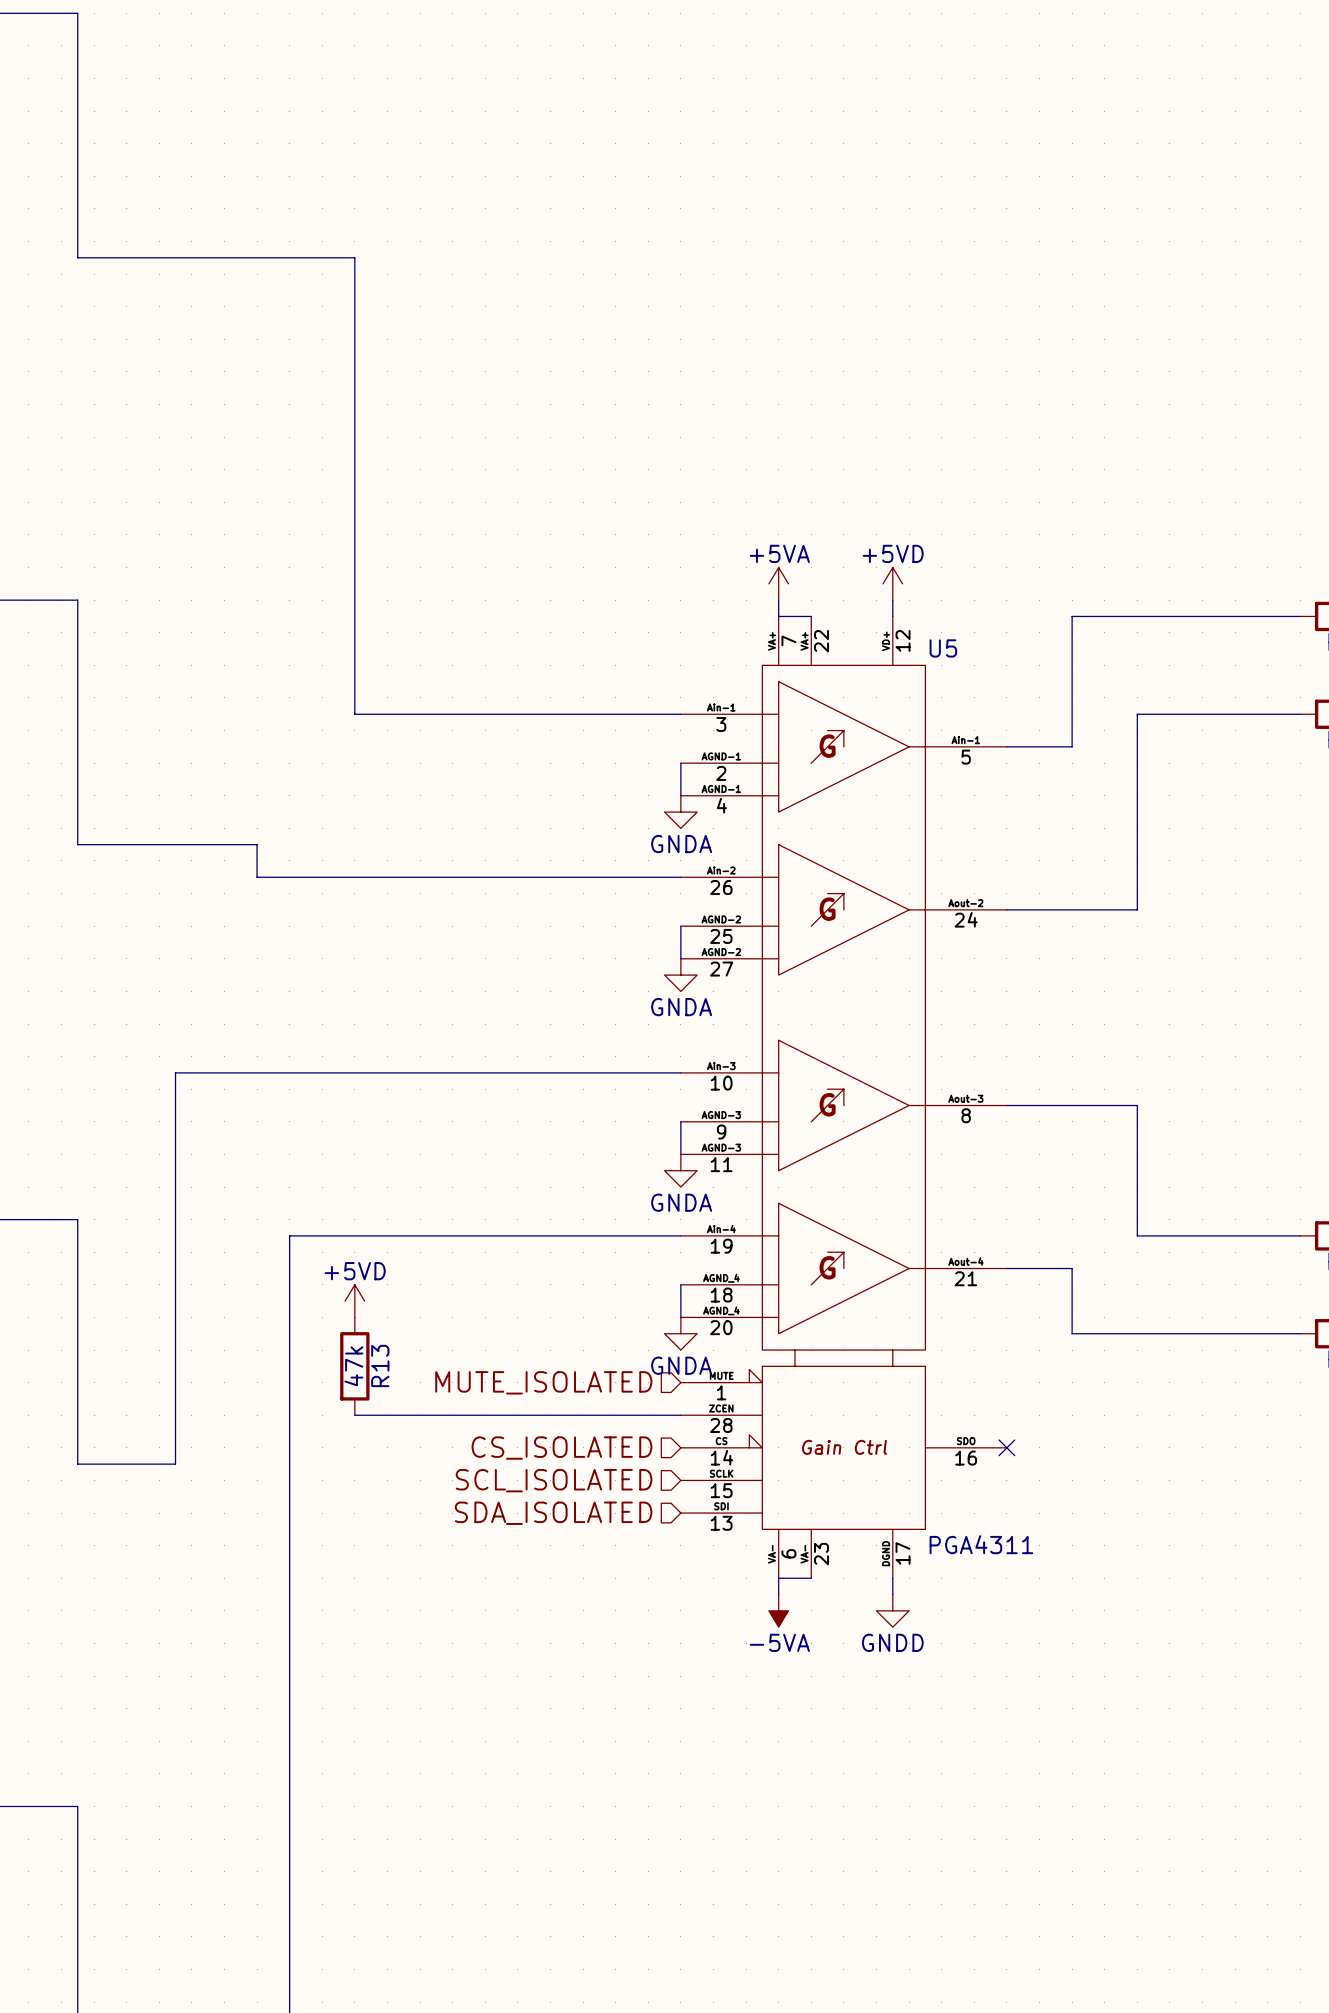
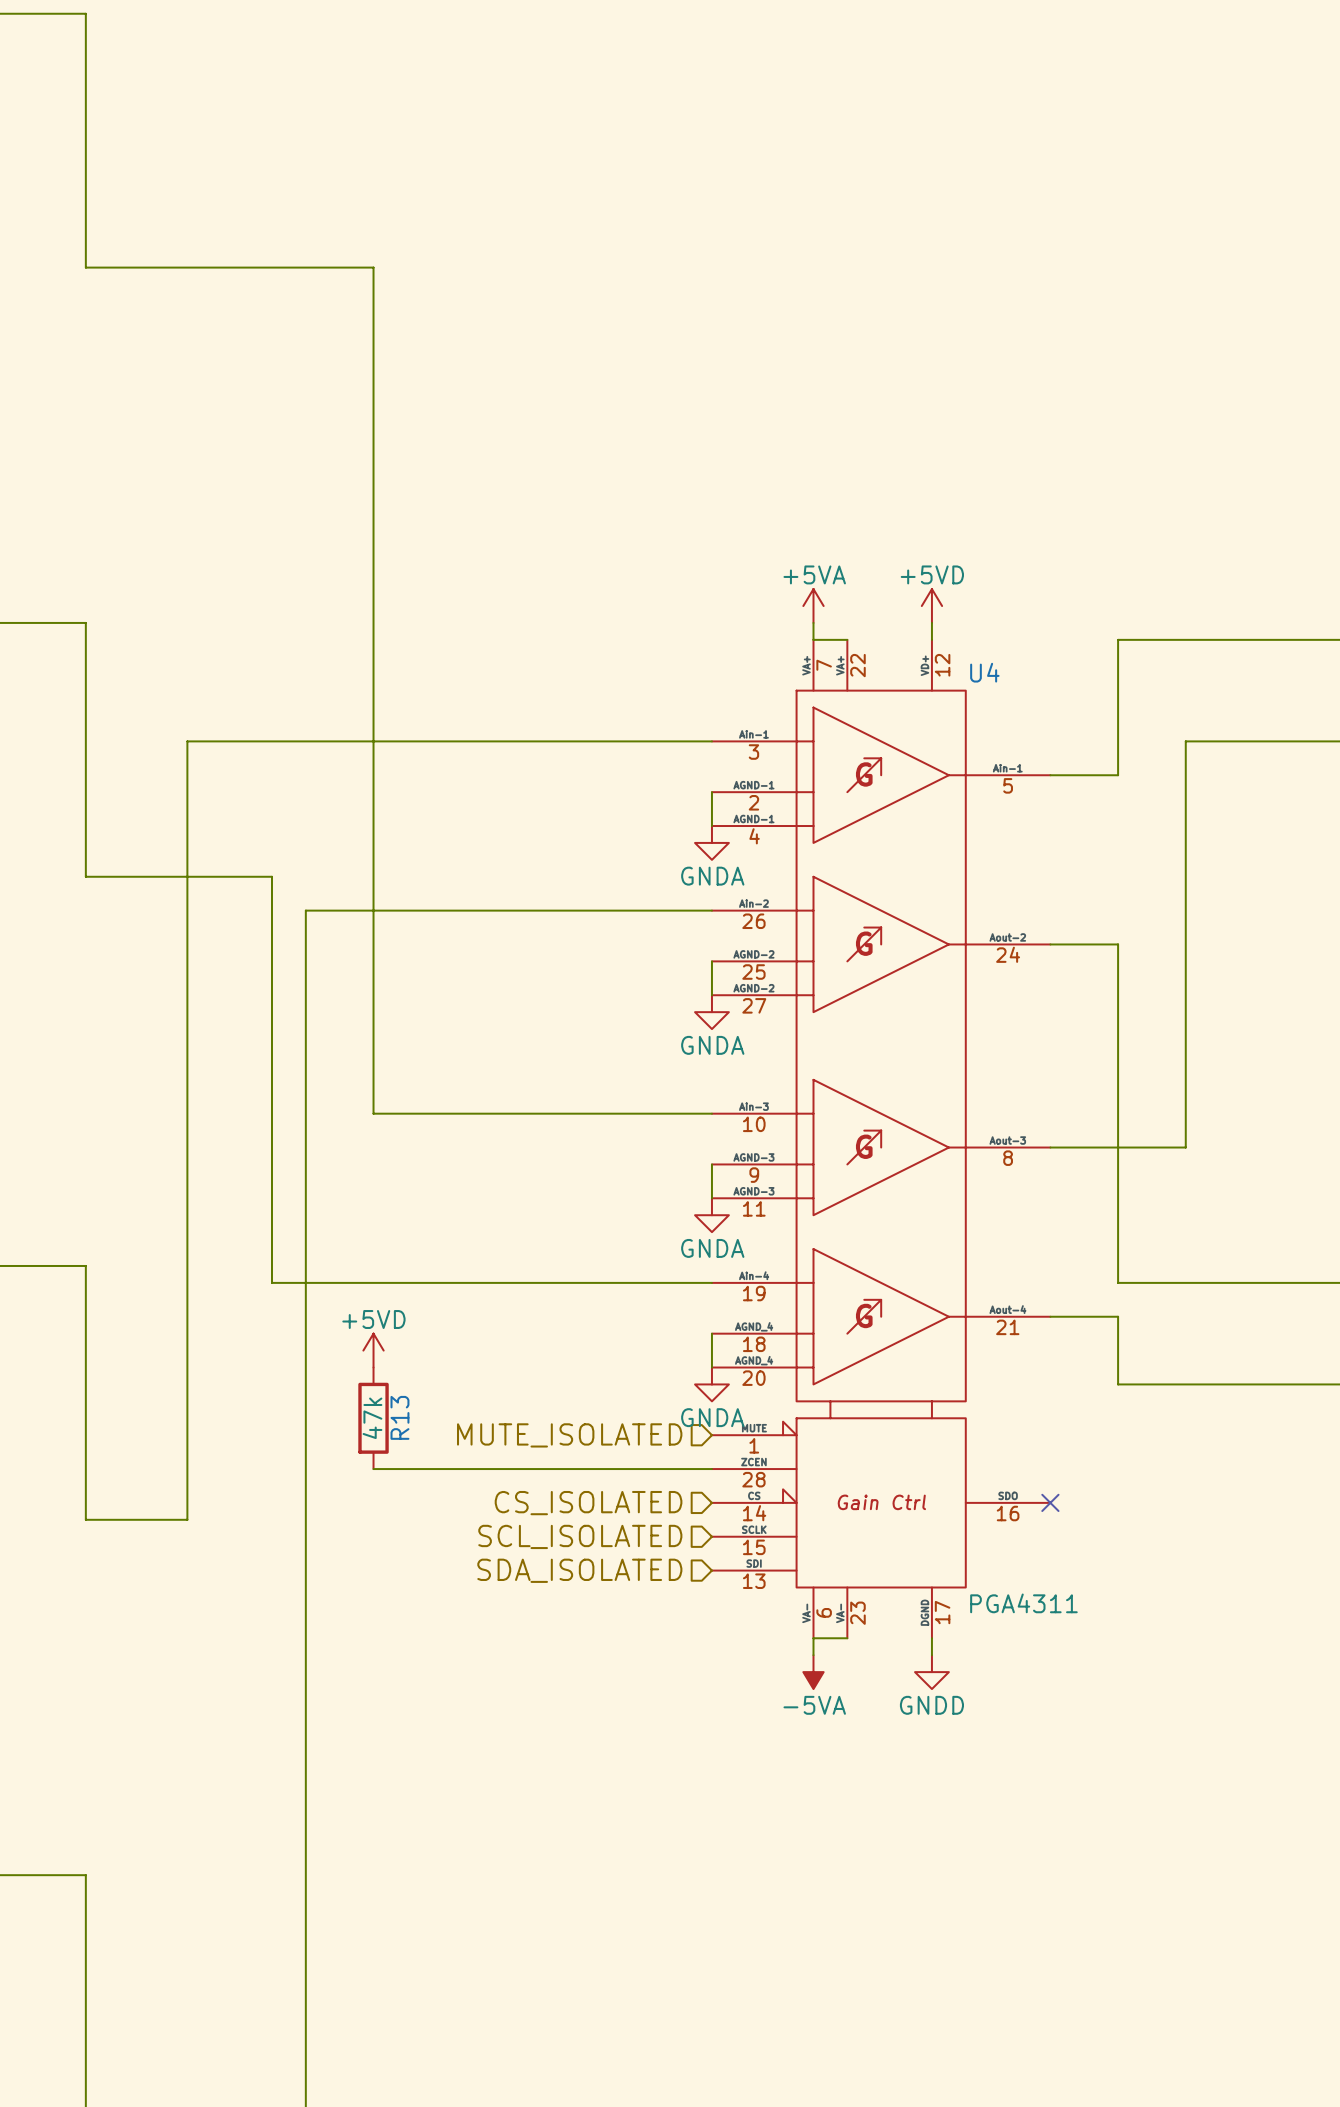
U5 name: U5 (943, 648) -> U4 (984, 672)
wire: (257, 877) (289, 877) -> (271, 910) (271, 1282) (305, 1282) (305, 910)
wire: (1072, 909) (1137, 909) -> (1185, 1147) (1185, 944)
wire: (175, 1072) (354, 1072) -> (187, 1113) (187, 741) (373, 741) (373, 1113)
wire: (1137, 1105) (1137, 1235) -> (1118, 944) (1118, 1282) (1185, 1282)

